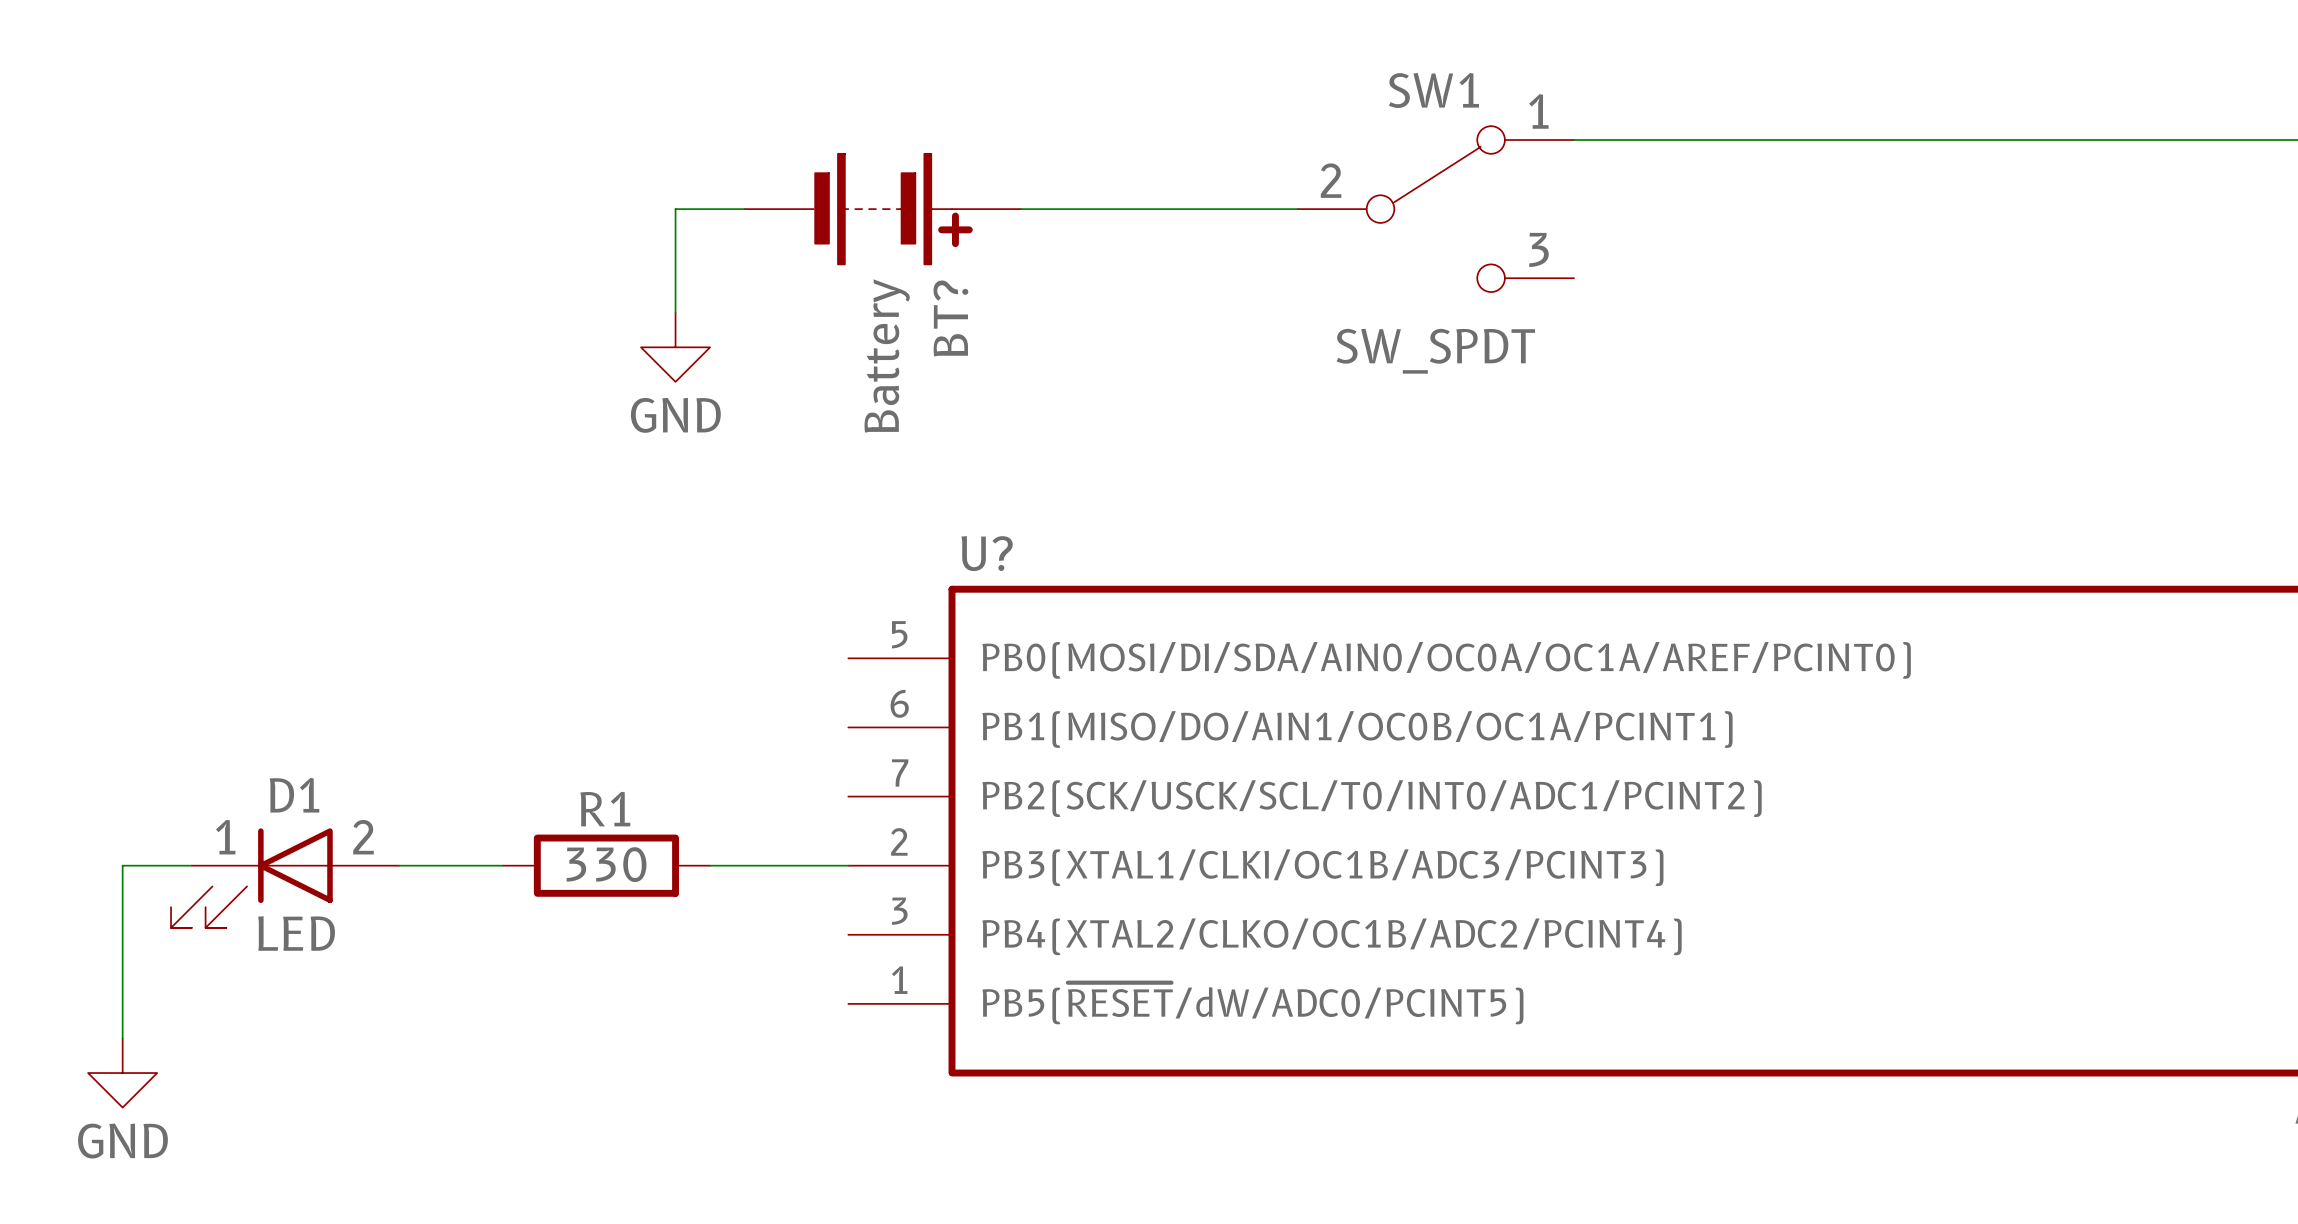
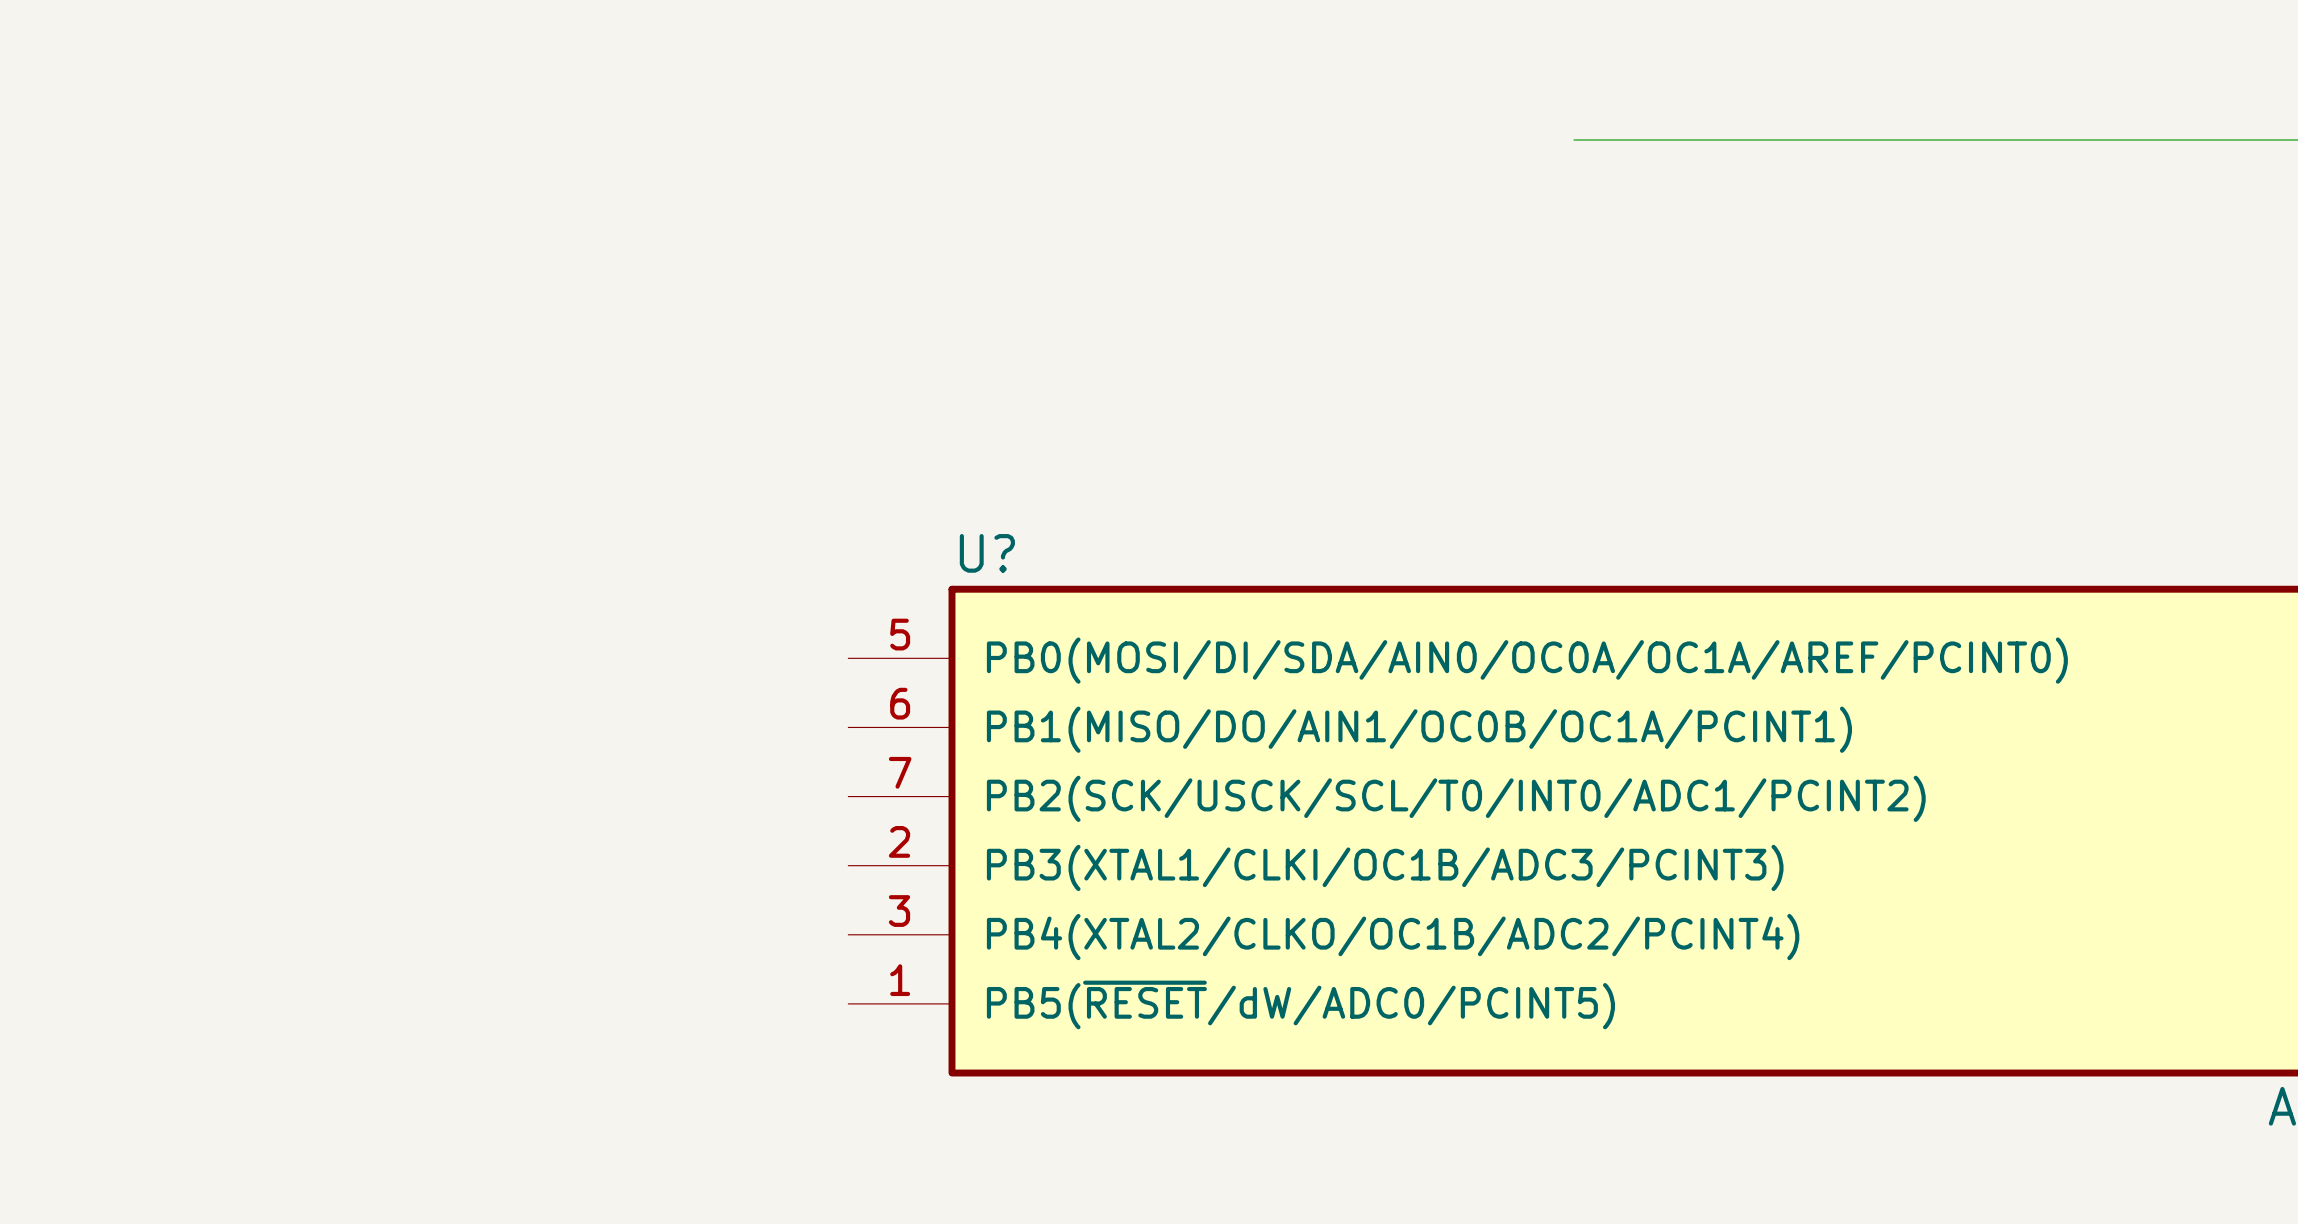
wire: (744, 209) (675, 209) (675, 312) -> none
BT?: Battery (882, 209) -> none
wire: (1021, 209) (1297, 209) -> none
SW1: SW_SPDT (1435, 209) -> none
power symbol: GND (675, 347) -> none
wire: (191, 865) (122, 865) (122, 1038) -> none
wire: (399, 865) (502, 865) -> none
R1: 330 (606, 865) -> none
wire: (710, 865) (848, 865) -> none
D1: LED (285, 878) -> none
power symbol: GND (122, 1073) -> none

